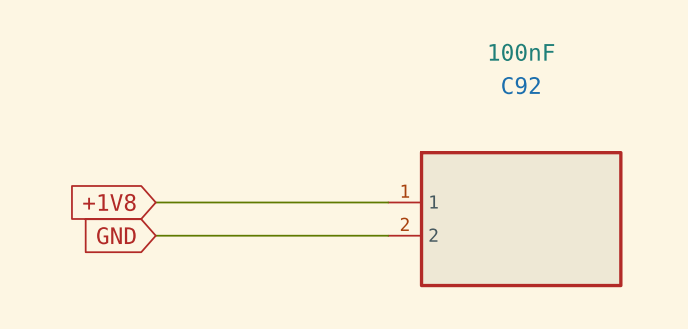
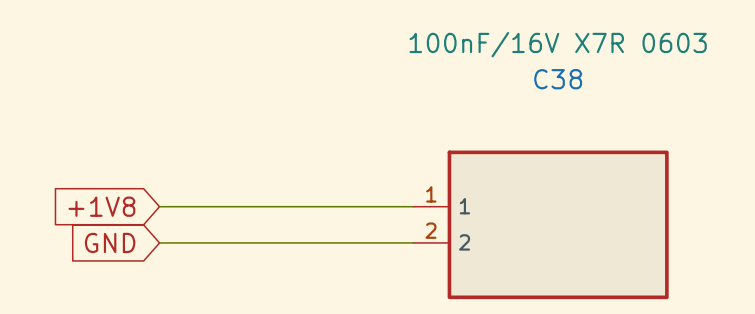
C92 value: 100nF (521, 52) -> 100nF/16V X7R 0603 (558, 44)
C92 name: C92 (521, 85) -> C38 (558, 79)

